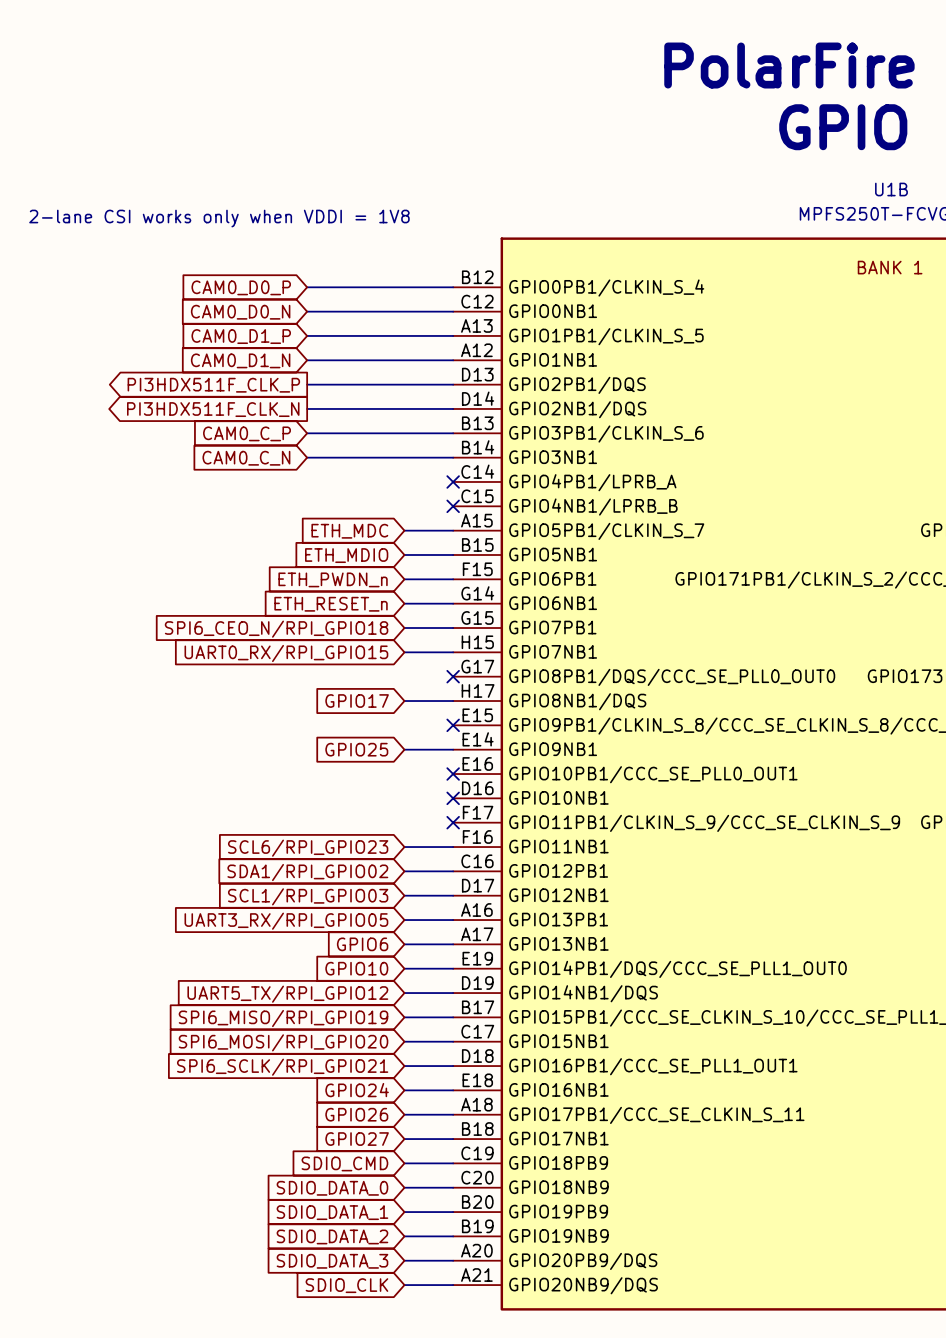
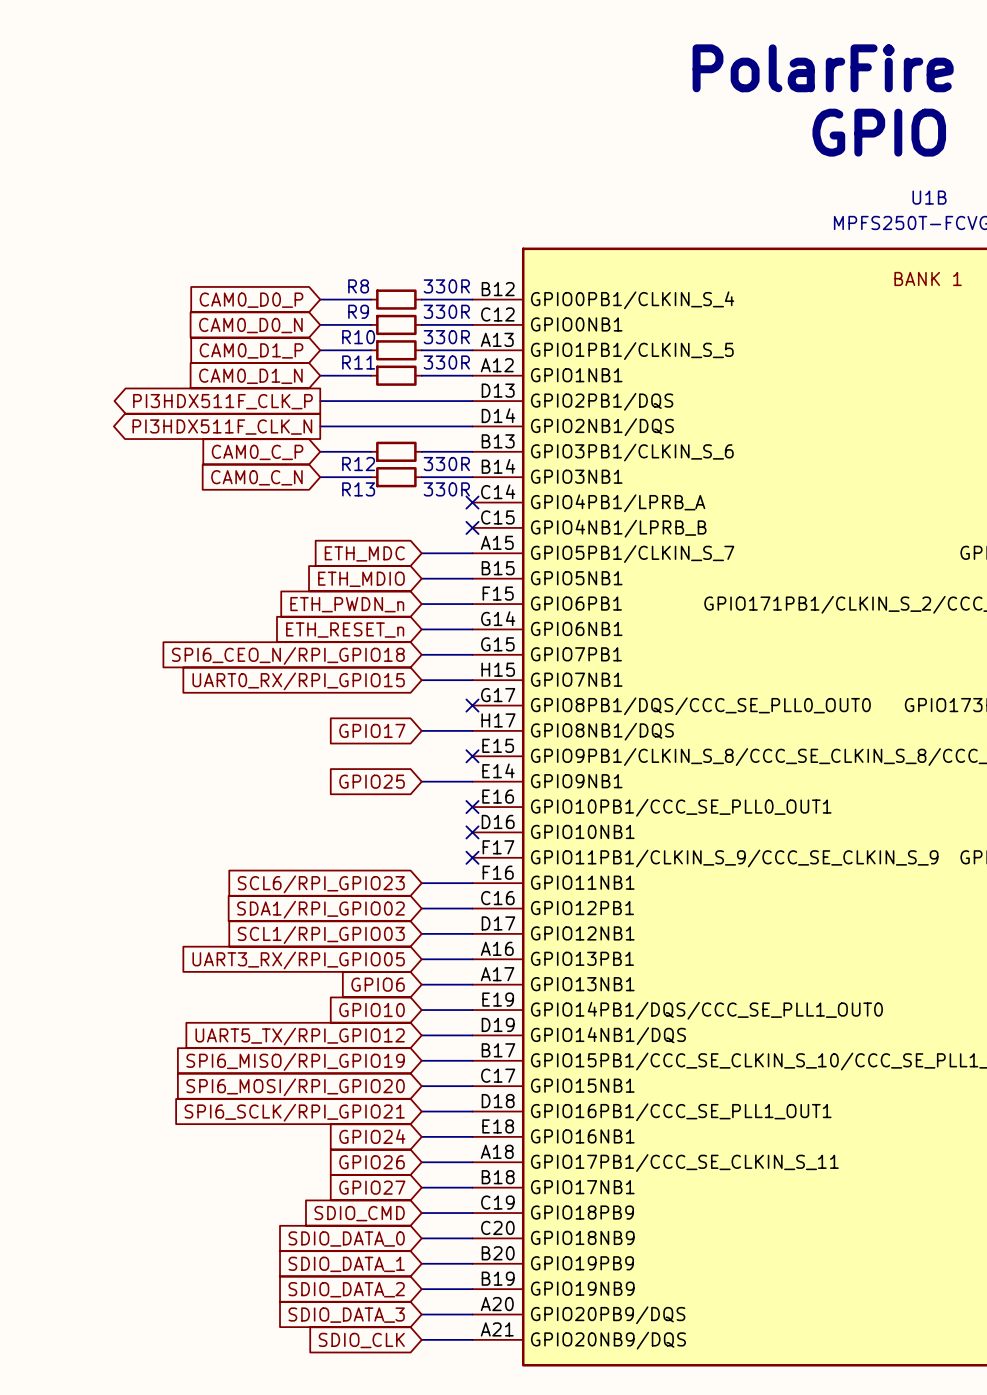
text: 2-lane CSI works only when VDDI = 1V8 (219, 218) -> none
wire: (355, 287) (404, 287) -> none
R8: none -> (396, 299)
wire: (355, 311) (404, 311) -> none
R9: none -> (396, 324)
wire: (355, 335) (404, 335) -> none
R10: none -> (396, 350)
wire: (355, 360) (404, 360) -> none
R11: none -> (396, 375)
wire: (355, 433) (404, 433) -> none
R12: none -> (396, 451)
wire: (355, 457) (404, 457) -> none
R13: none -> (396, 477)

